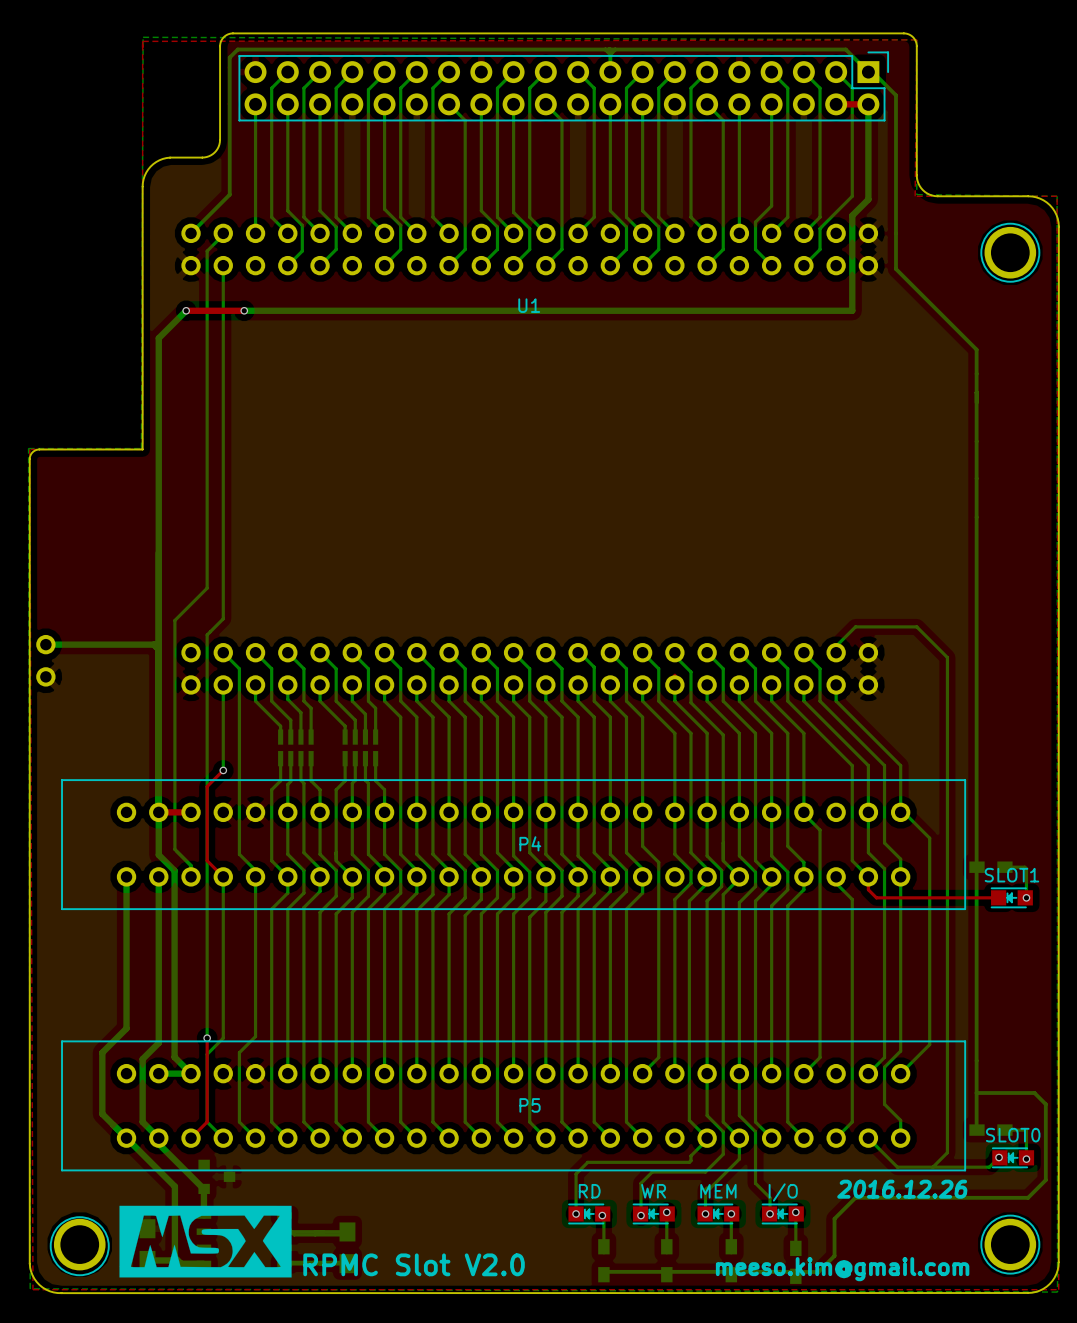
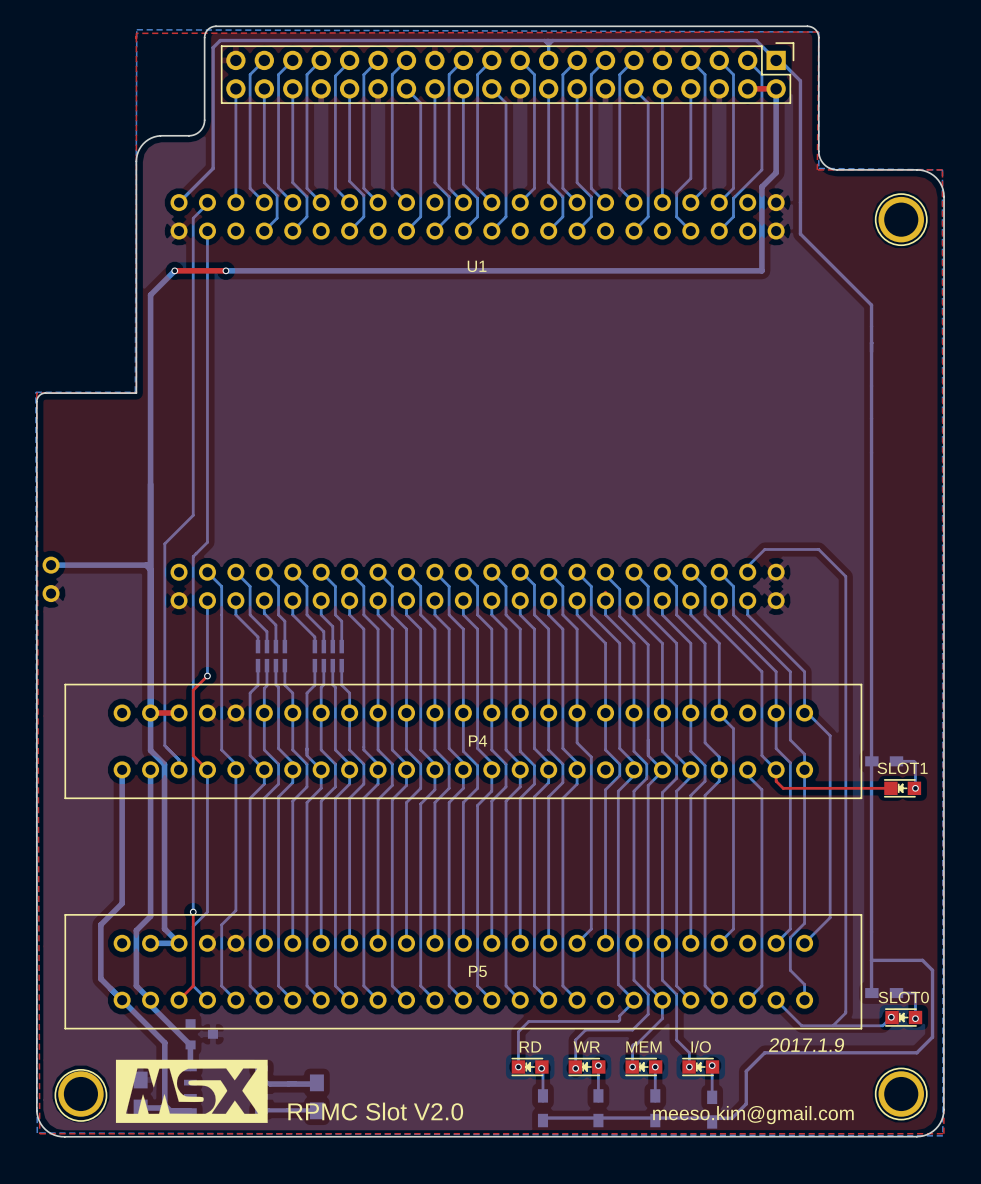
text: 2016.12.26 (902, 1189) -> 2017.1.9 (806, 1045)

